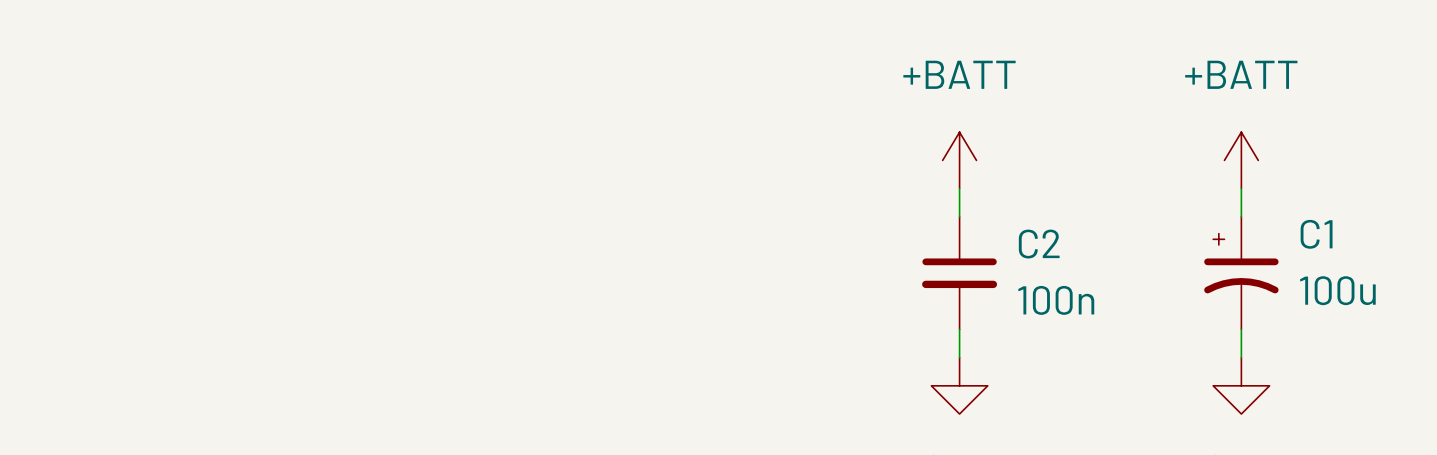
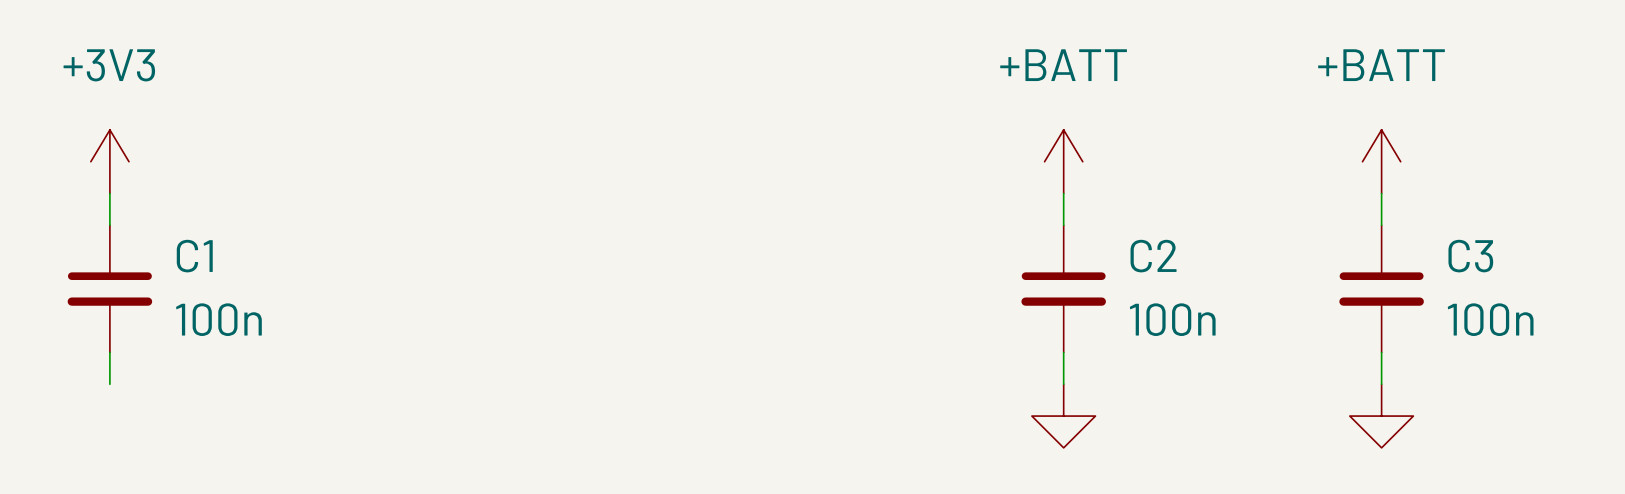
power symbol: none -> +3V3 (109, 161)
wire: none -> (109, 193) (109, 225)
C1 symbol: [1204, 216, 1279, 330] -> [67, 225, 153, 353]
C3: none -> 100n (1381, 288)
C1 value: 100u (1337, 290) -> 100n (218, 319)
wire: none -> (109, 352) (109, 384)

